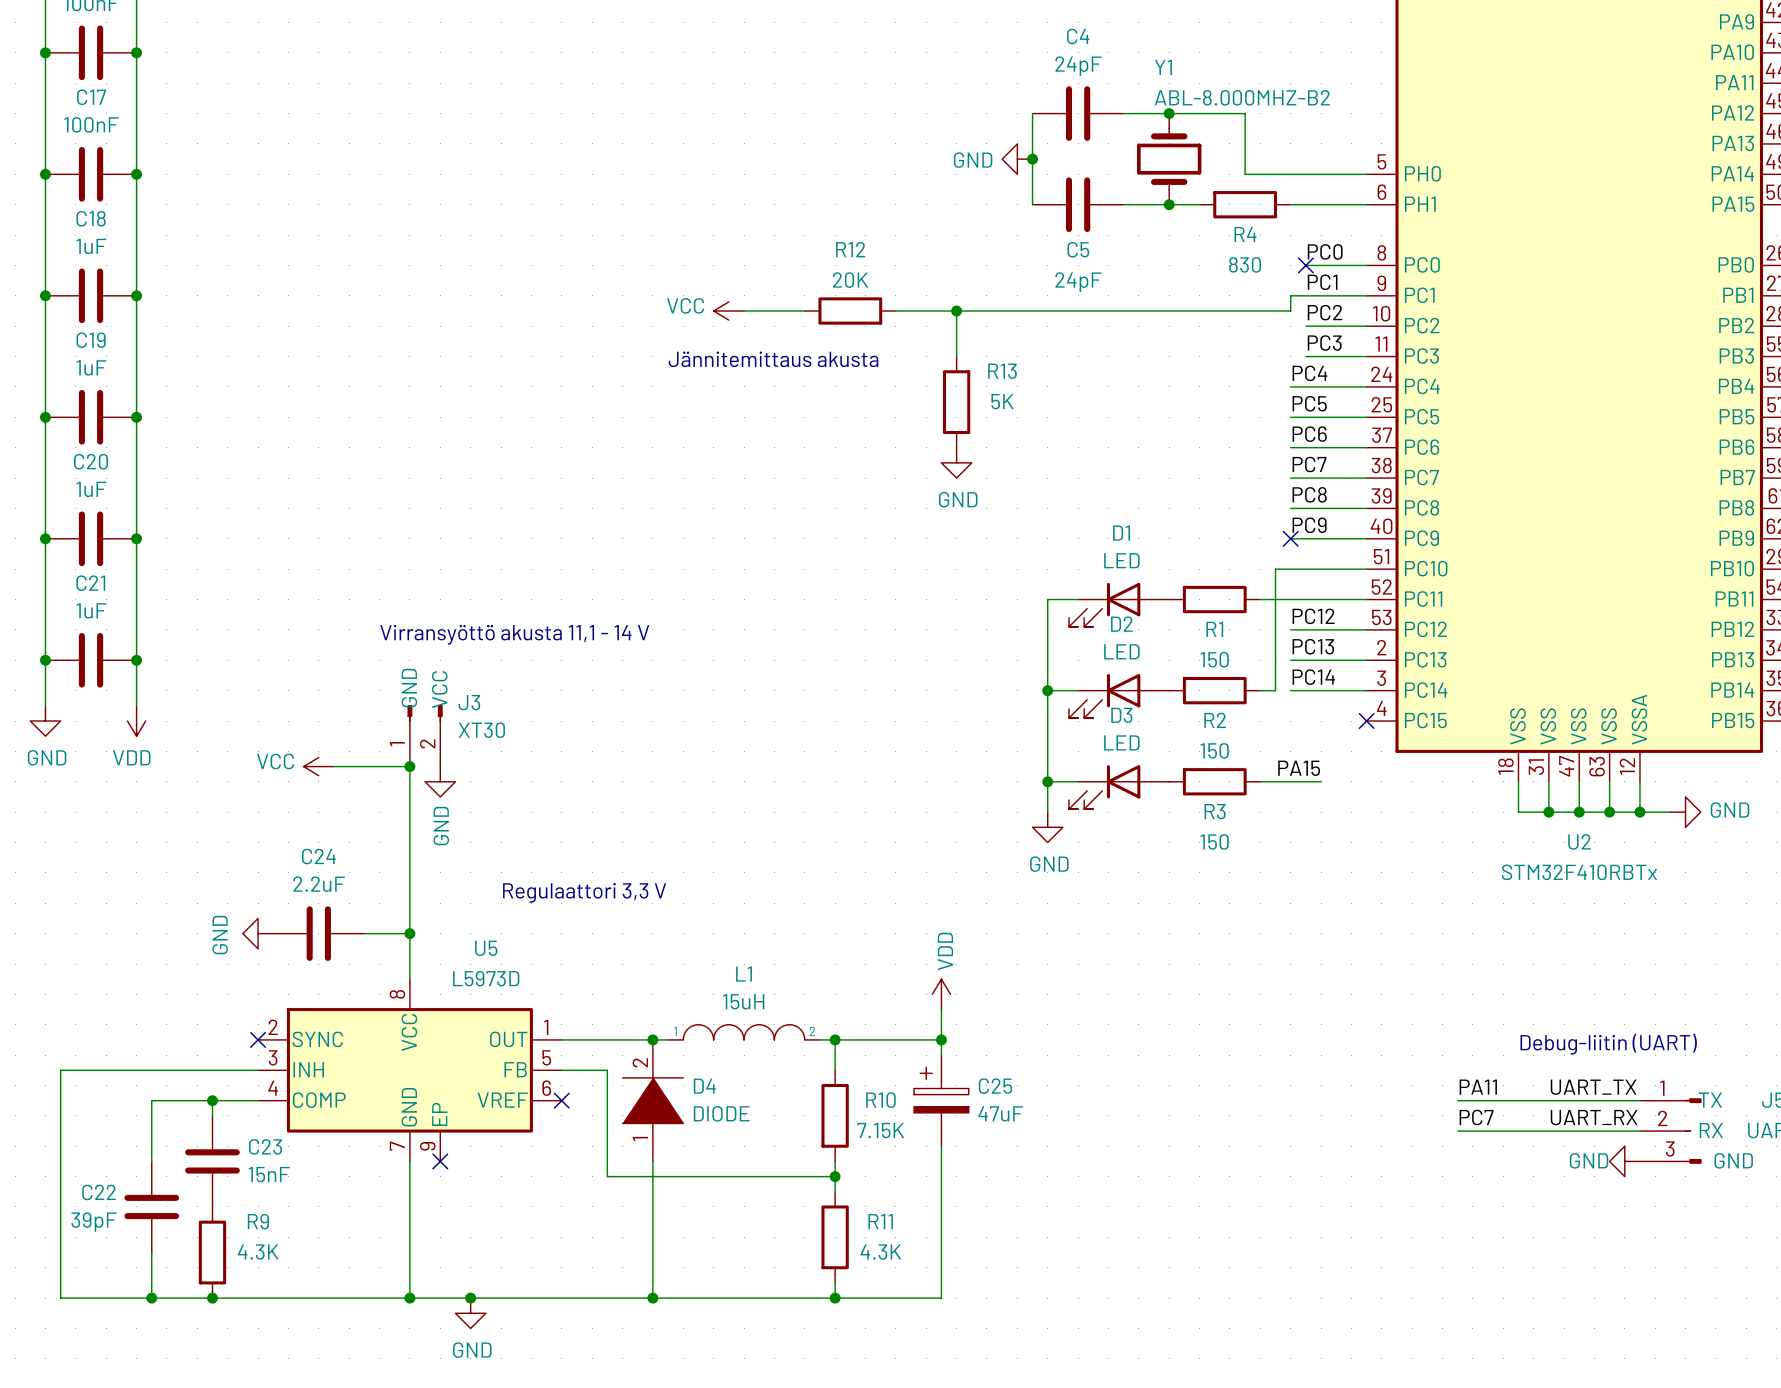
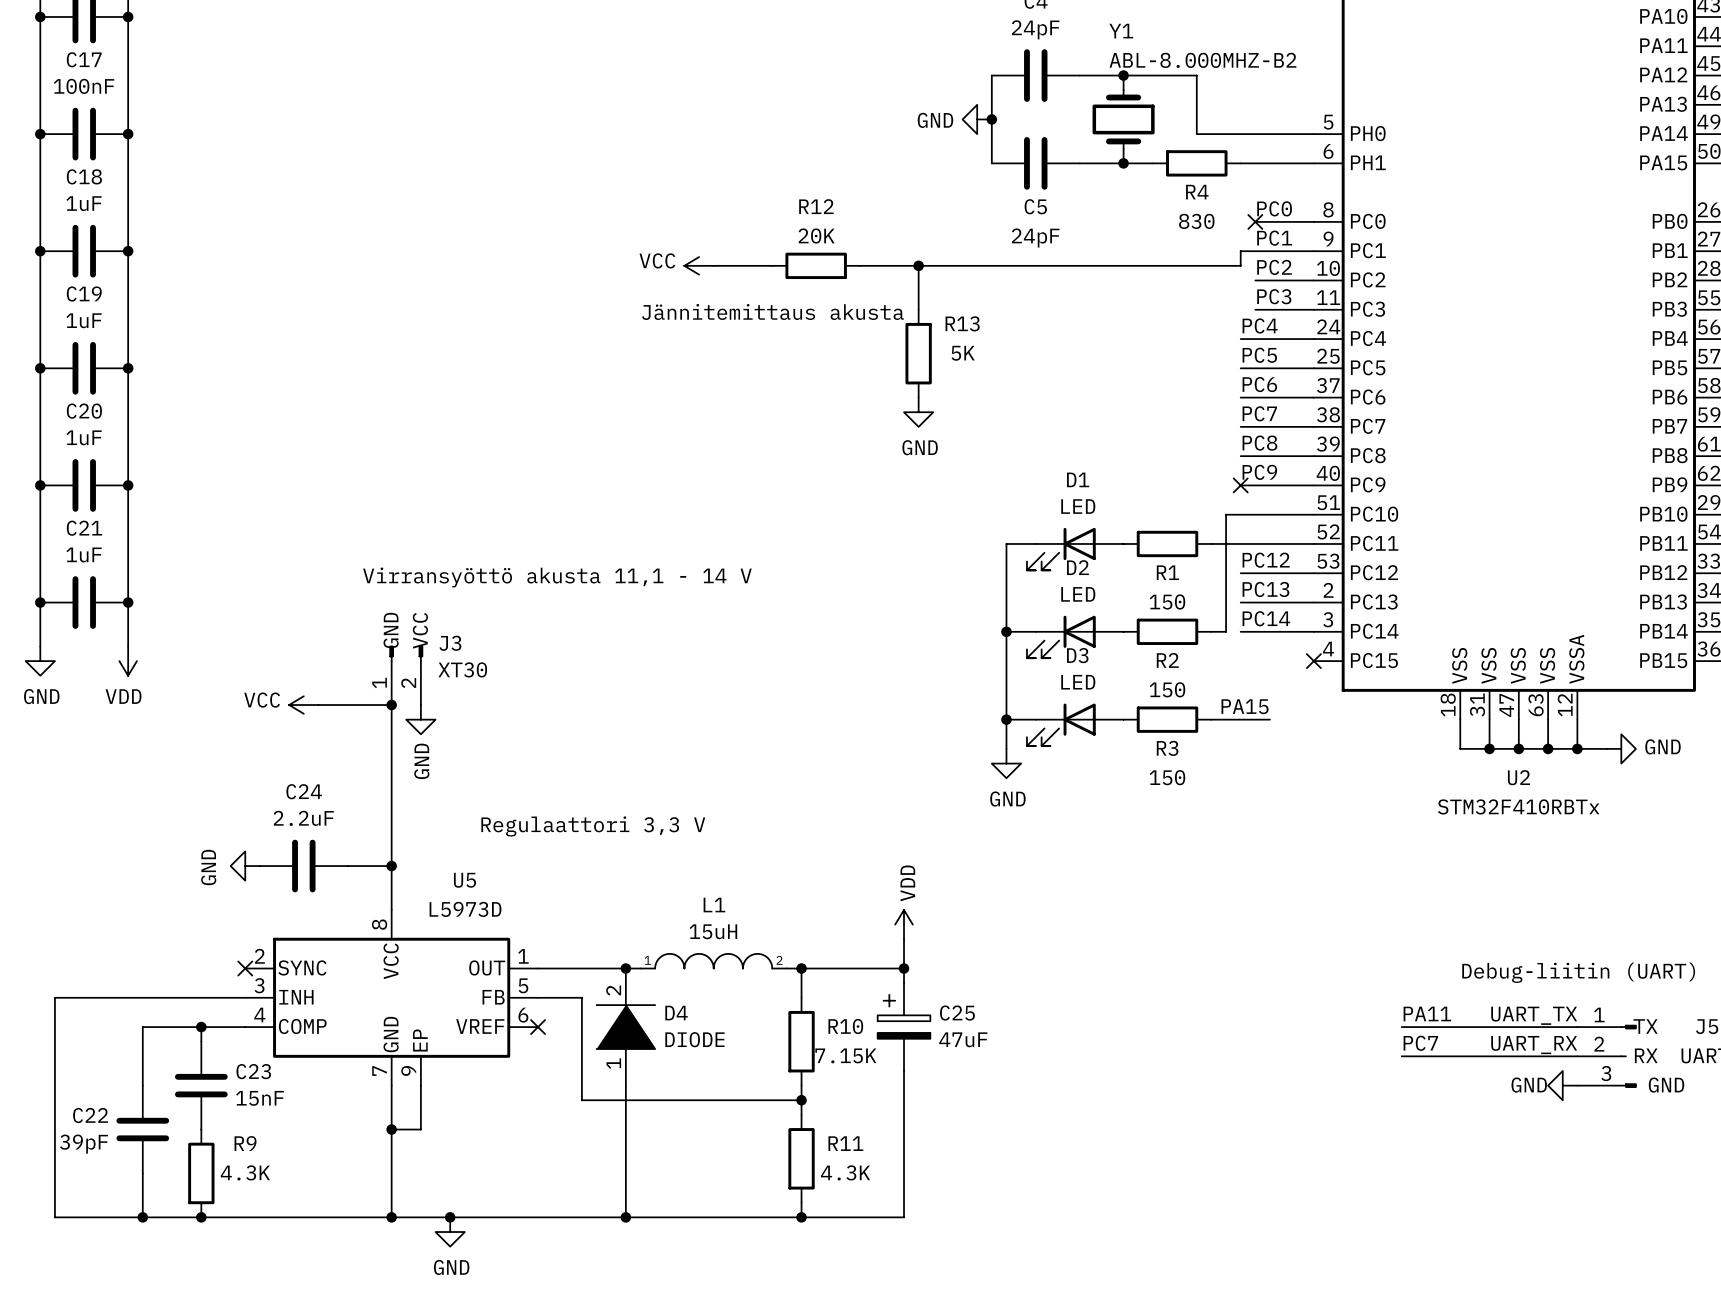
wire: none -> (420, 1085) (420, 1129) (391, 1129)
no-connect mark: (440, 1161) -> none
junction: none -> (391, 1129)

